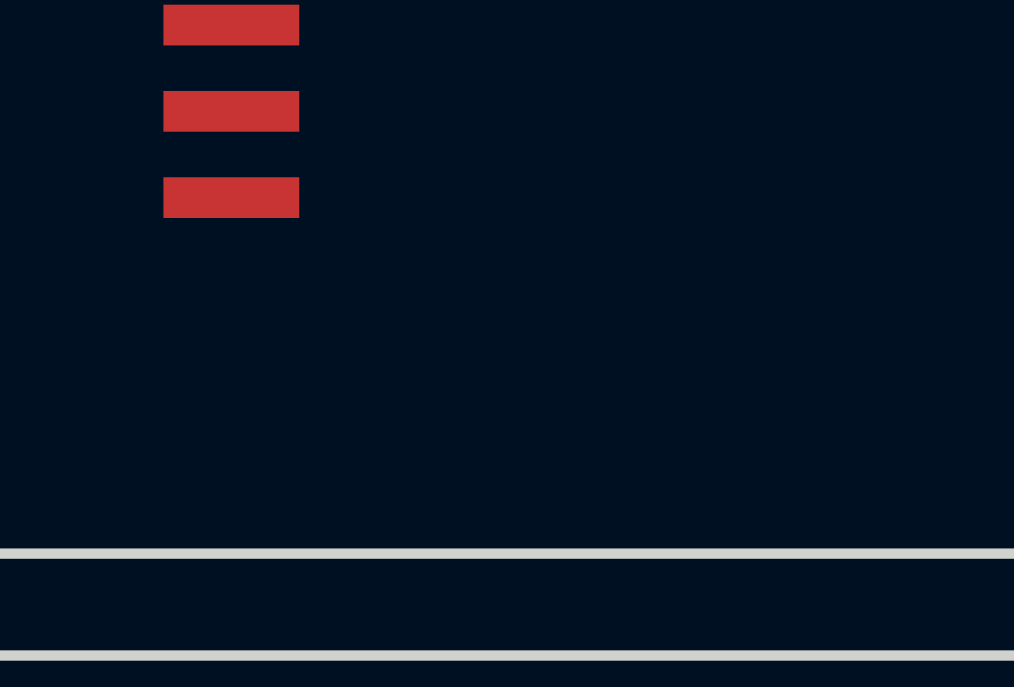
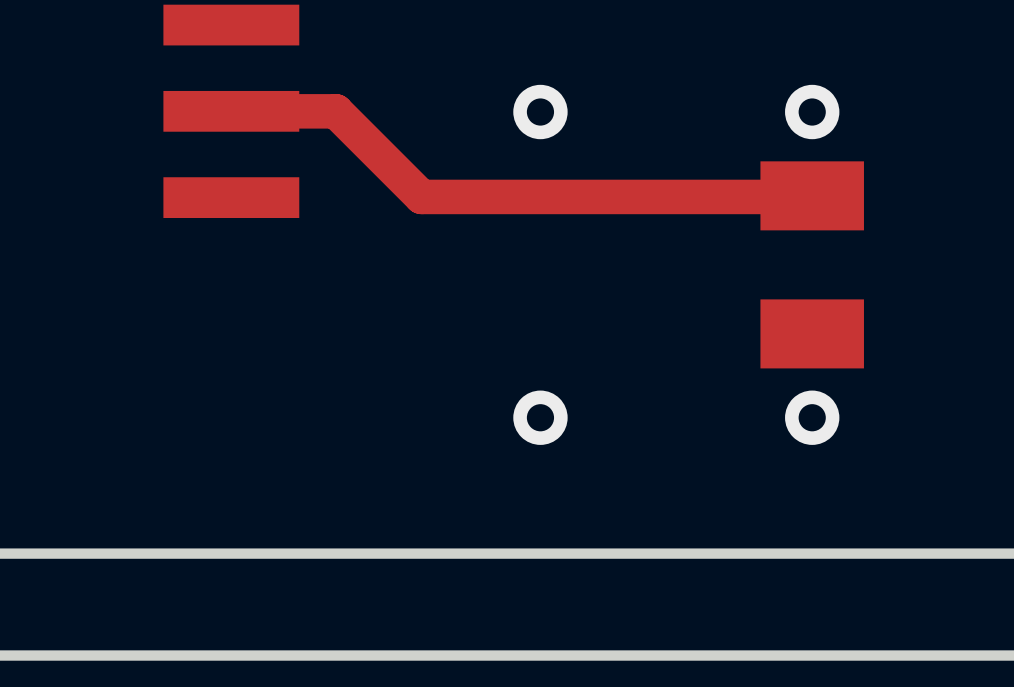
top track: none -> (231, 111) (335, 111) (421, 196) (812, 196)
via: none -> (540, 112)
via: none -> (812, 112)
part: none -> (812, 264)
via: none -> (540, 417)
via: none -> (812, 417)

